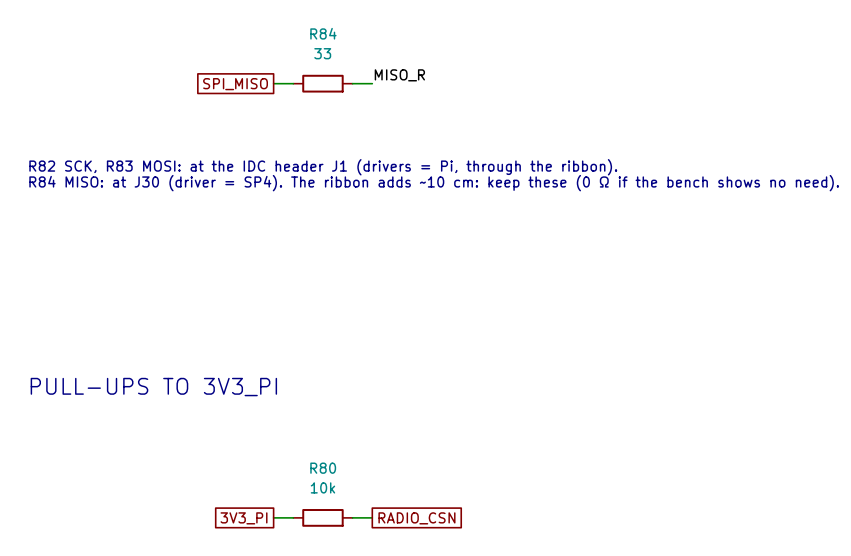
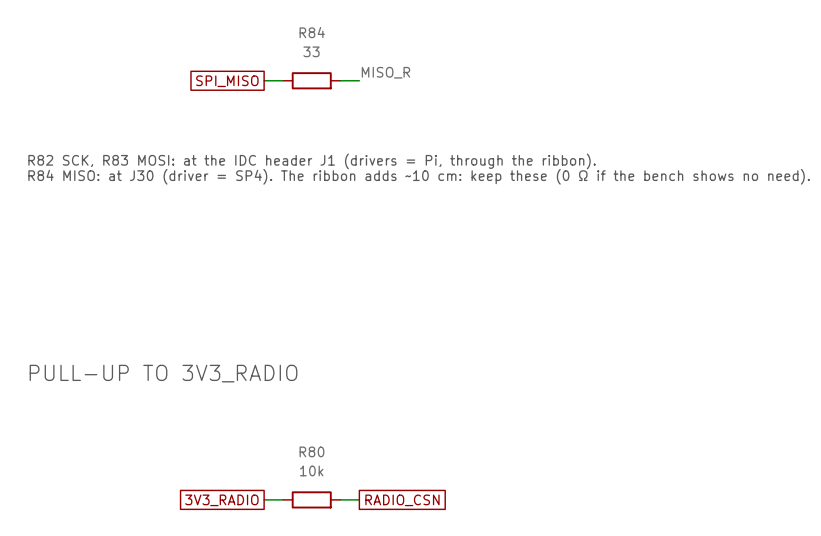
text: PULL-UPS TO 3V3_PI (153, 387) -> PULL-UP TO 3V3_RADIO (163, 373)
global label: 3V3_PI (243, 518) -> 3V3_RADIO (221, 500)

